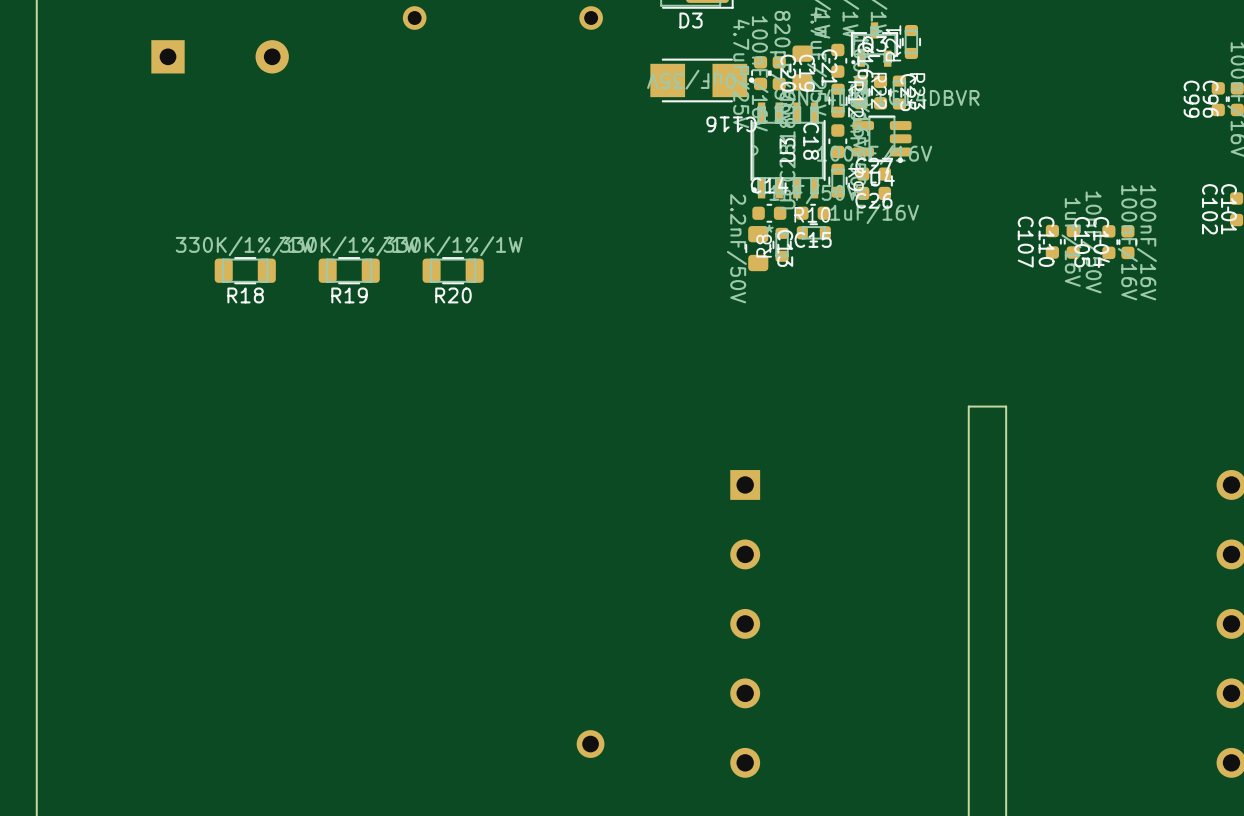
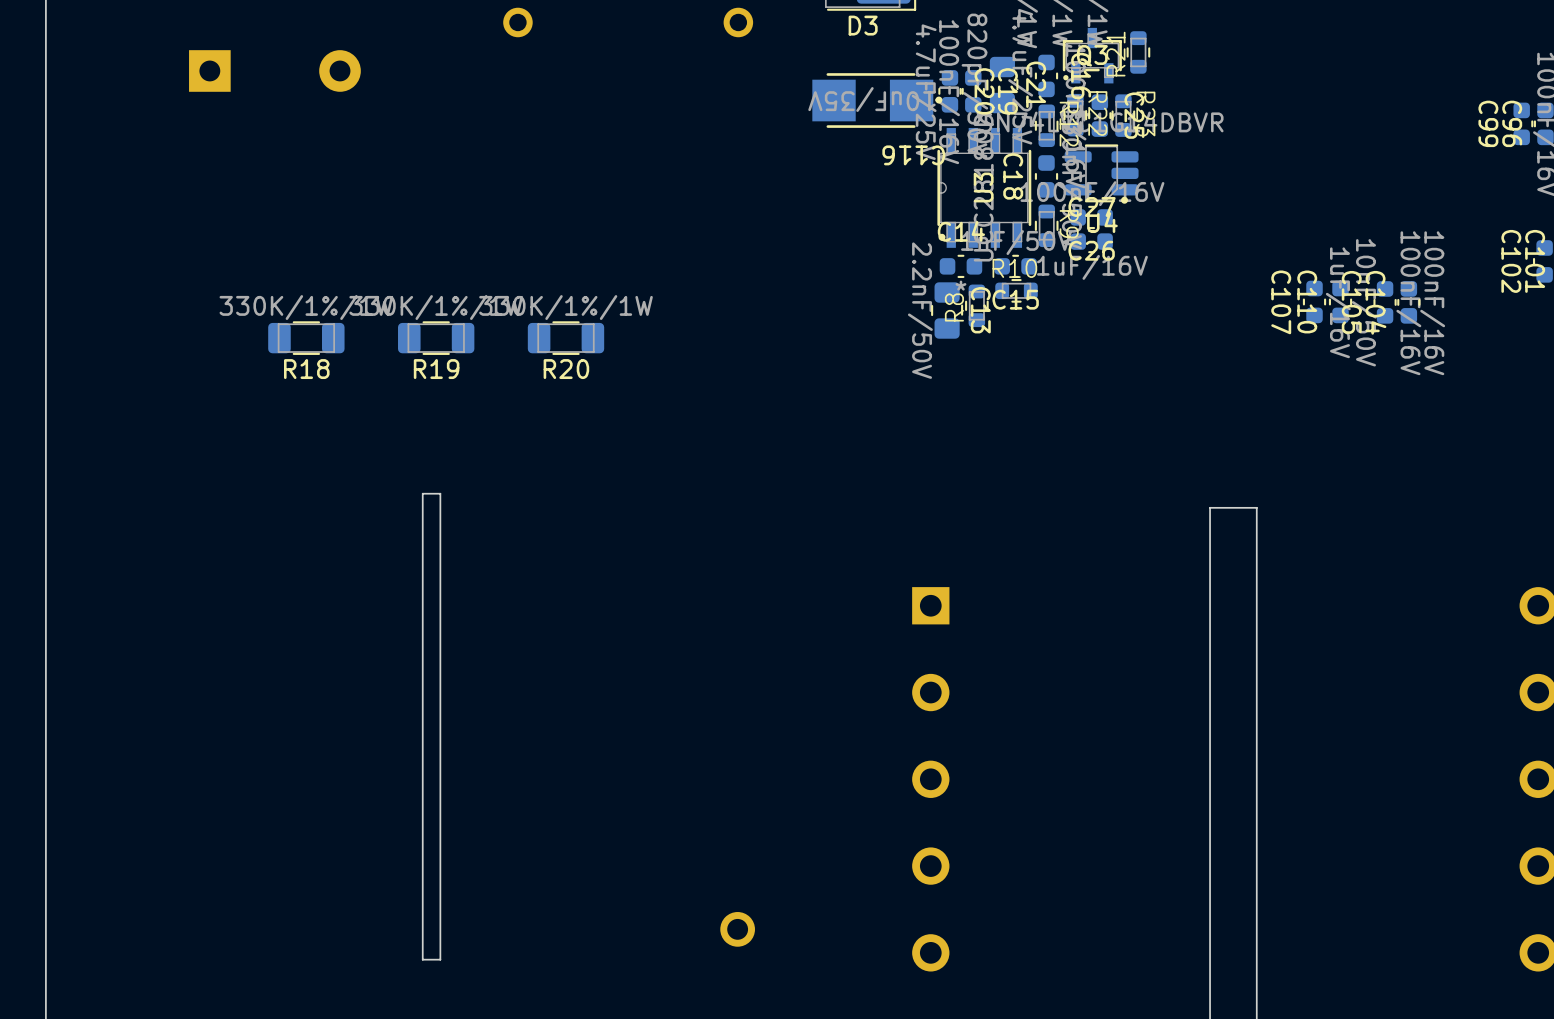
board edge: none -> (440, 493) (422, 493) (422, 959) (440, 959) (440, 493)

